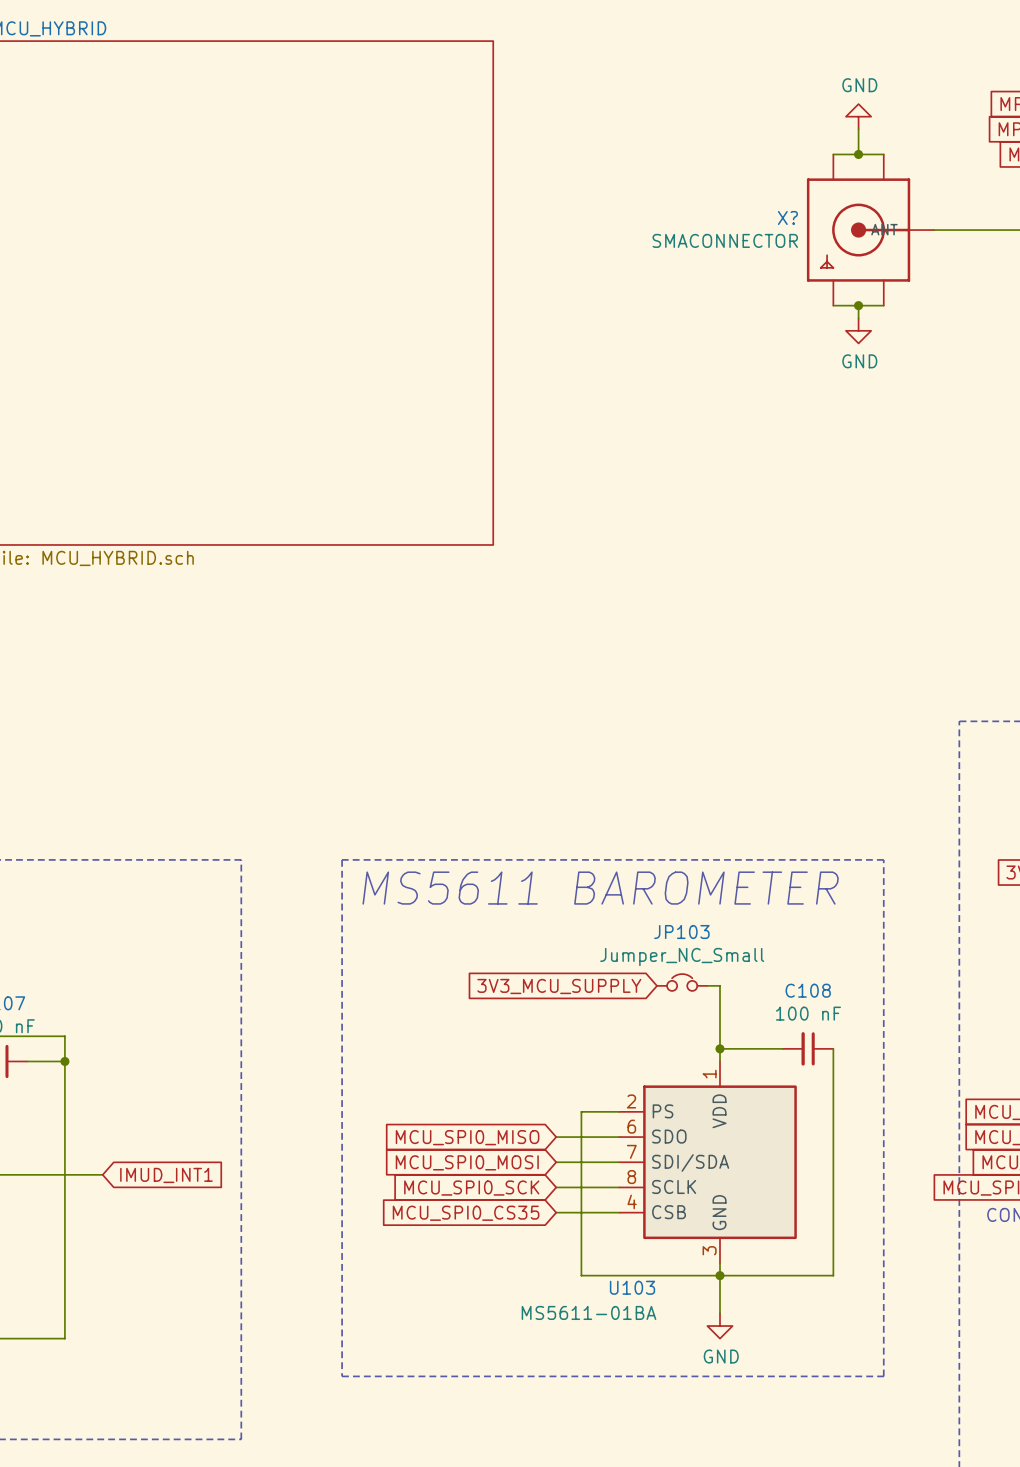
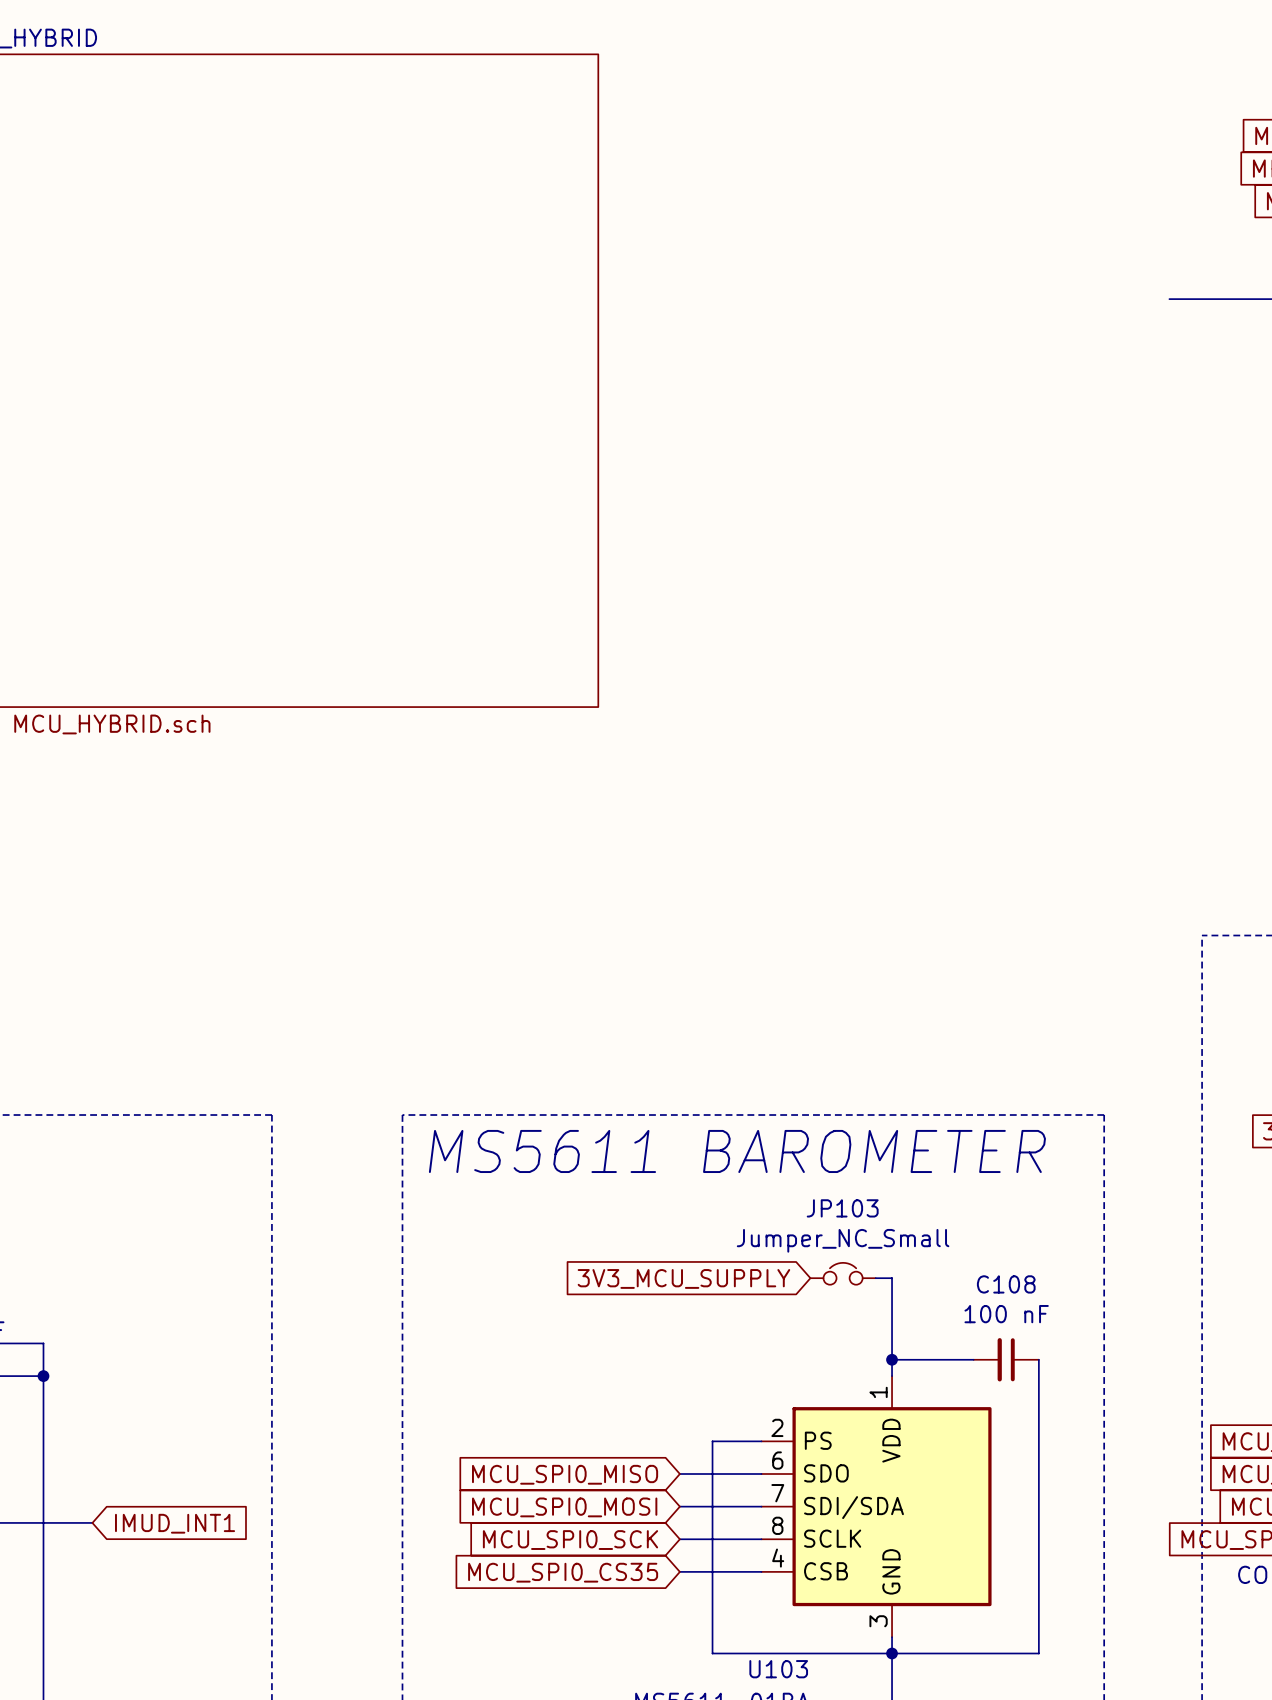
power symbol: GND (858, 116) -> none
wire: (858, 129) (858, 154) -> none
wire: (833, 154) (883, 154) -> none
junction: (858, 154) -> none
X?: SMACONNECTOR (870, 230) -> none
wire: (833, 305) (883, 305) -> none
wire: (858, 305) (858, 318) -> none
junction: (858, 305) -> none
power symbol: GND (858, 330) -> none

